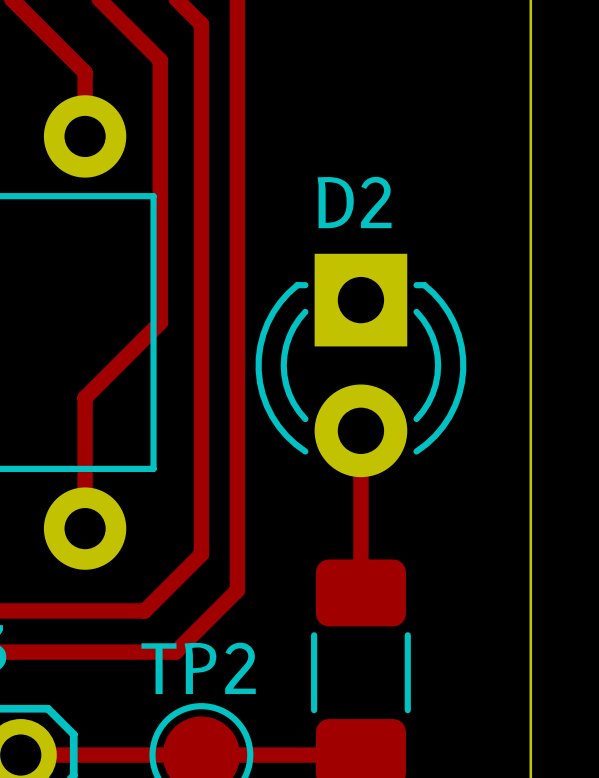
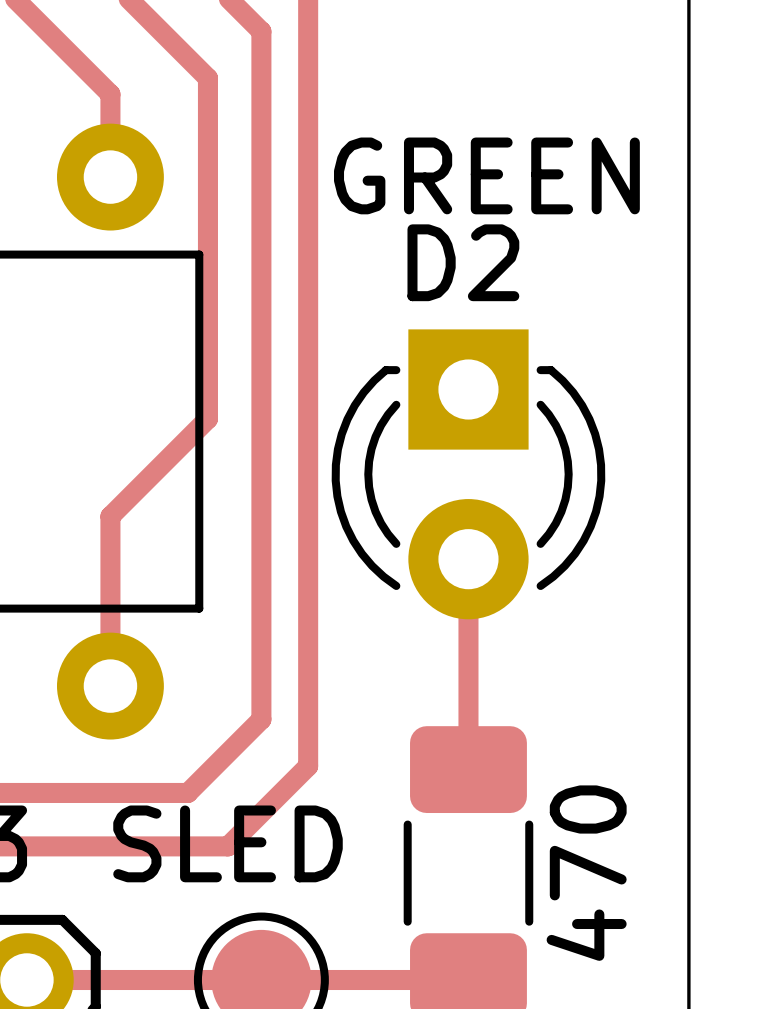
D2 value: none -> GREEN (486, 175)
TP2 value: none -> SLED (228, 843)
TP2 name: TP2 (198, 668) -> none
part value: none -> 470 (586, 873)

